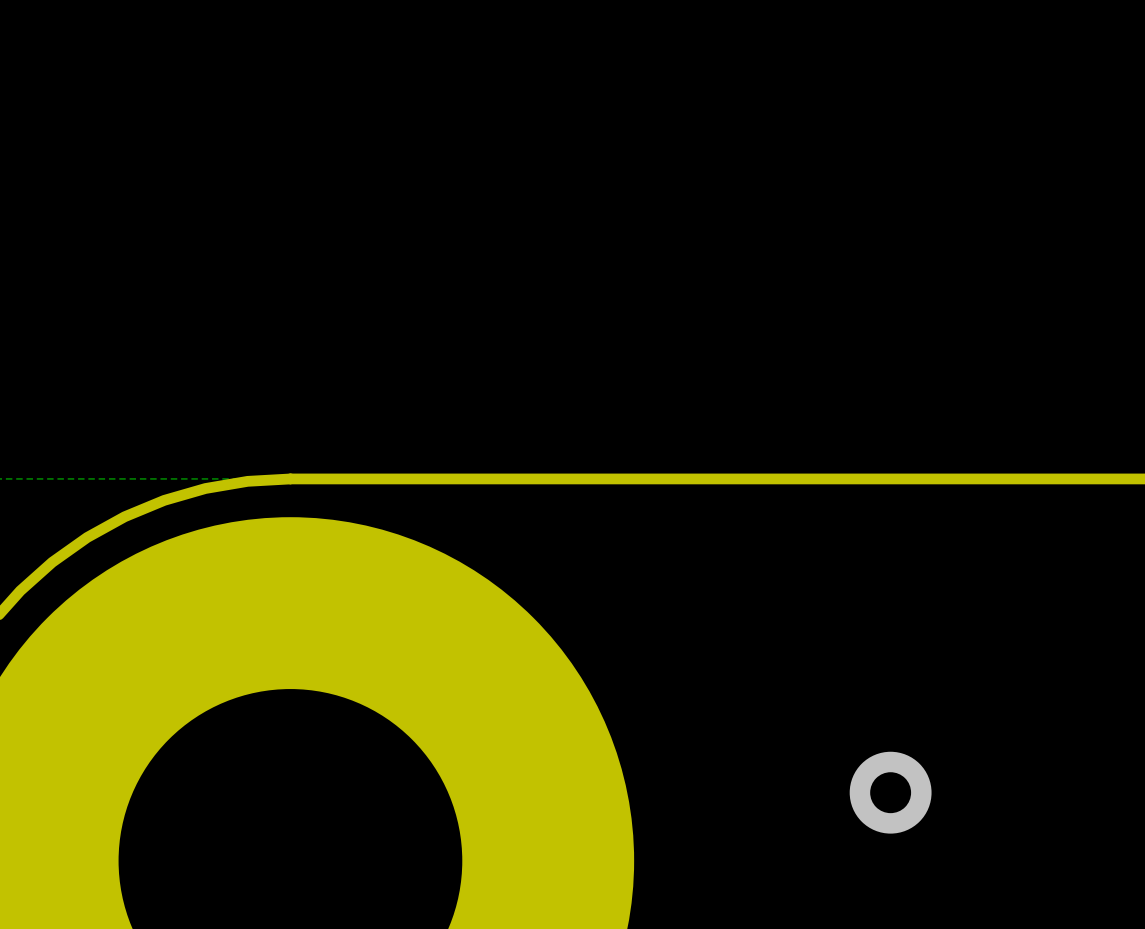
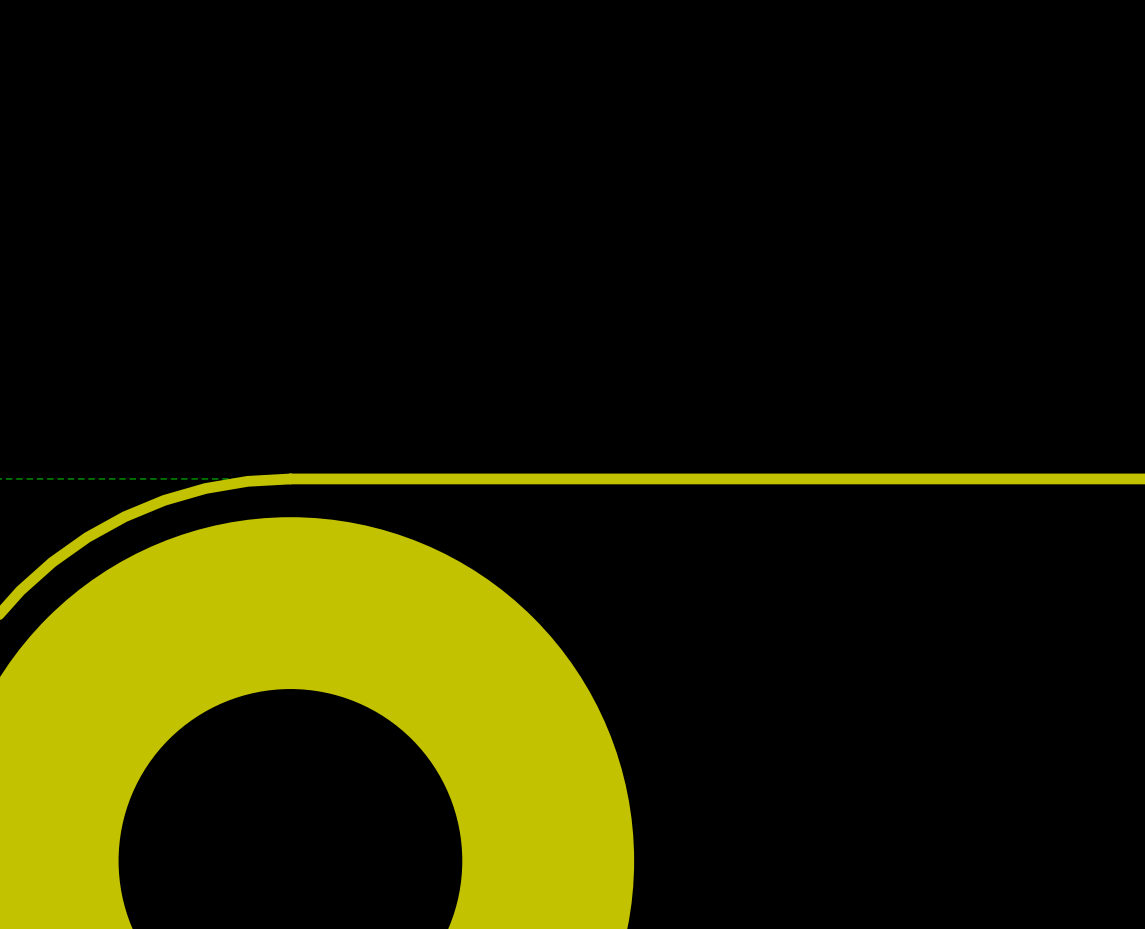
via: (890, 792) -> none

